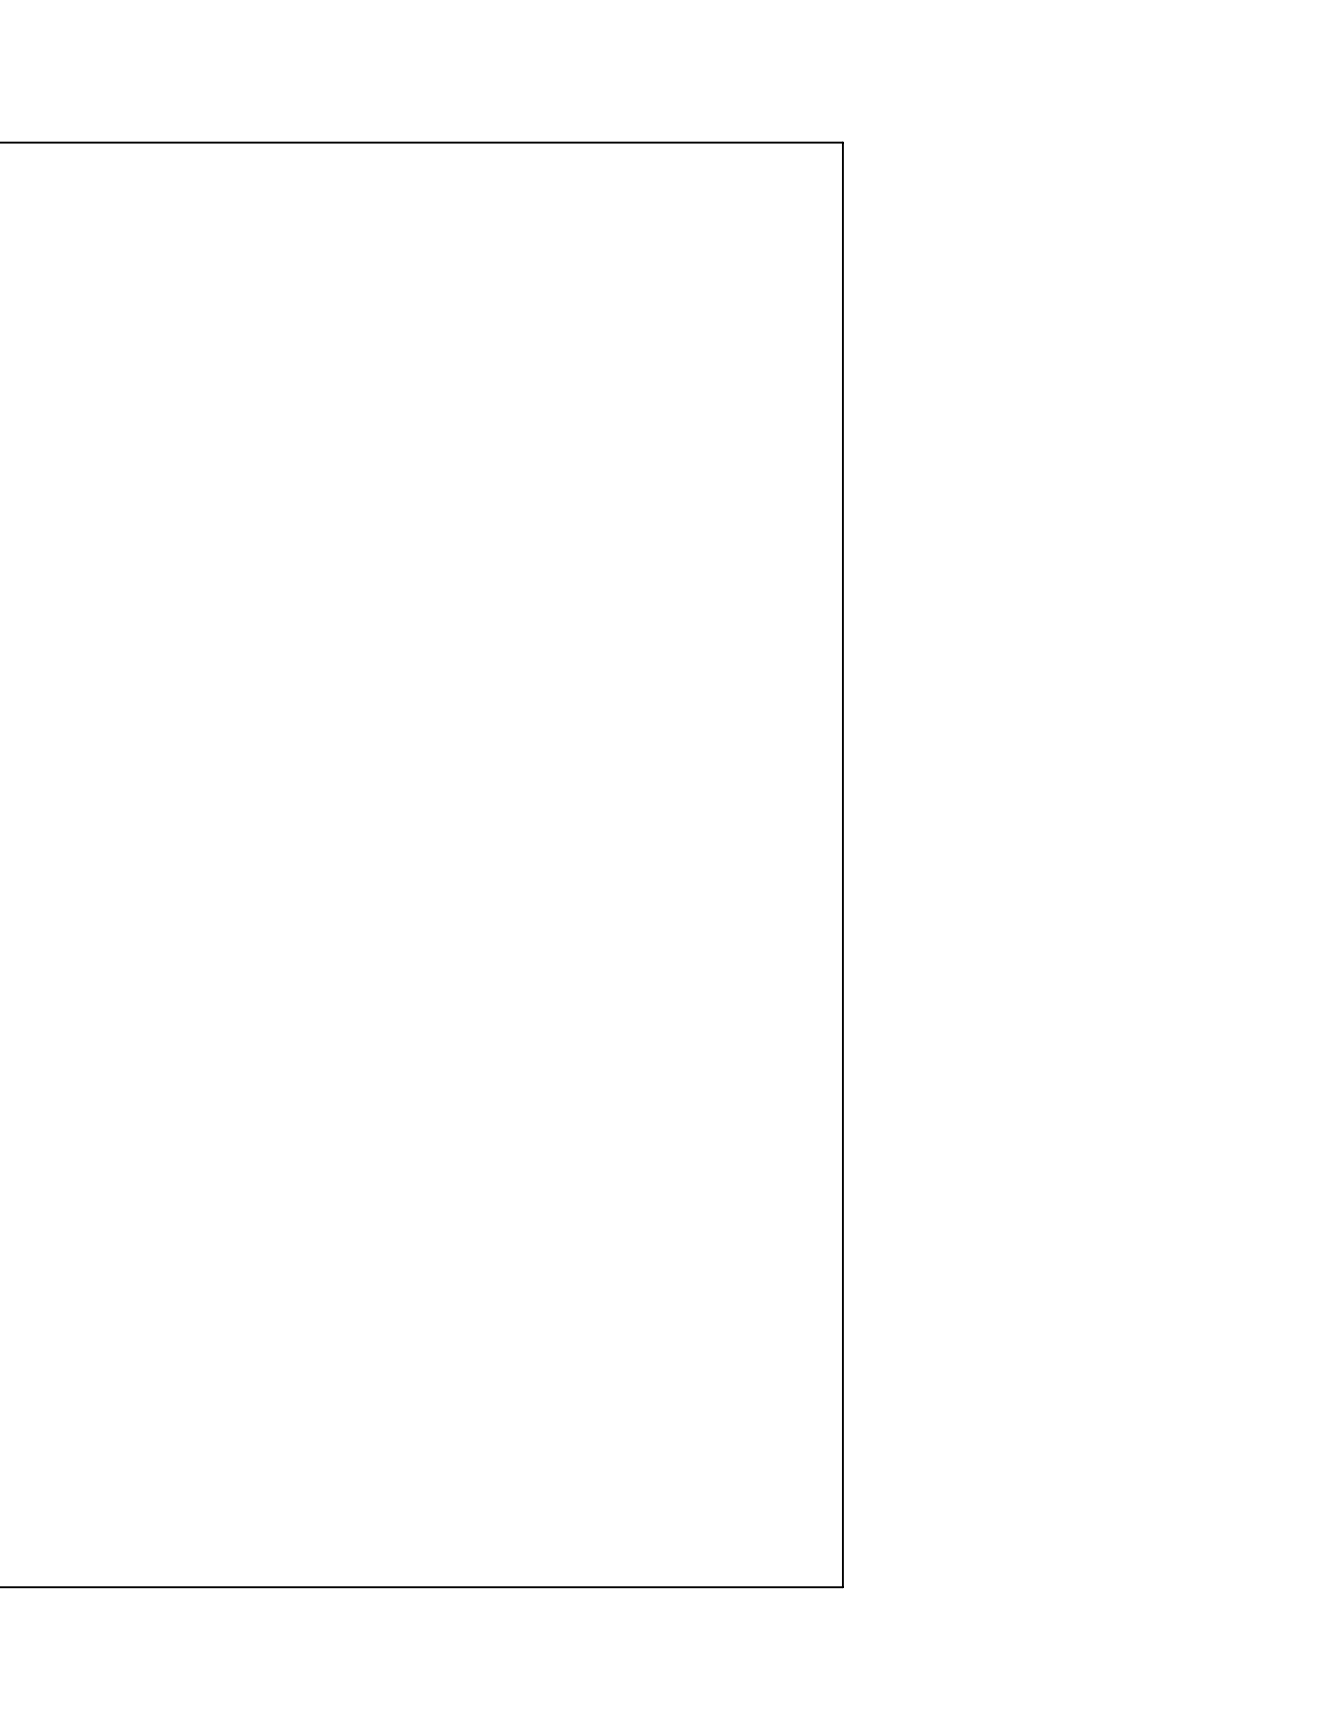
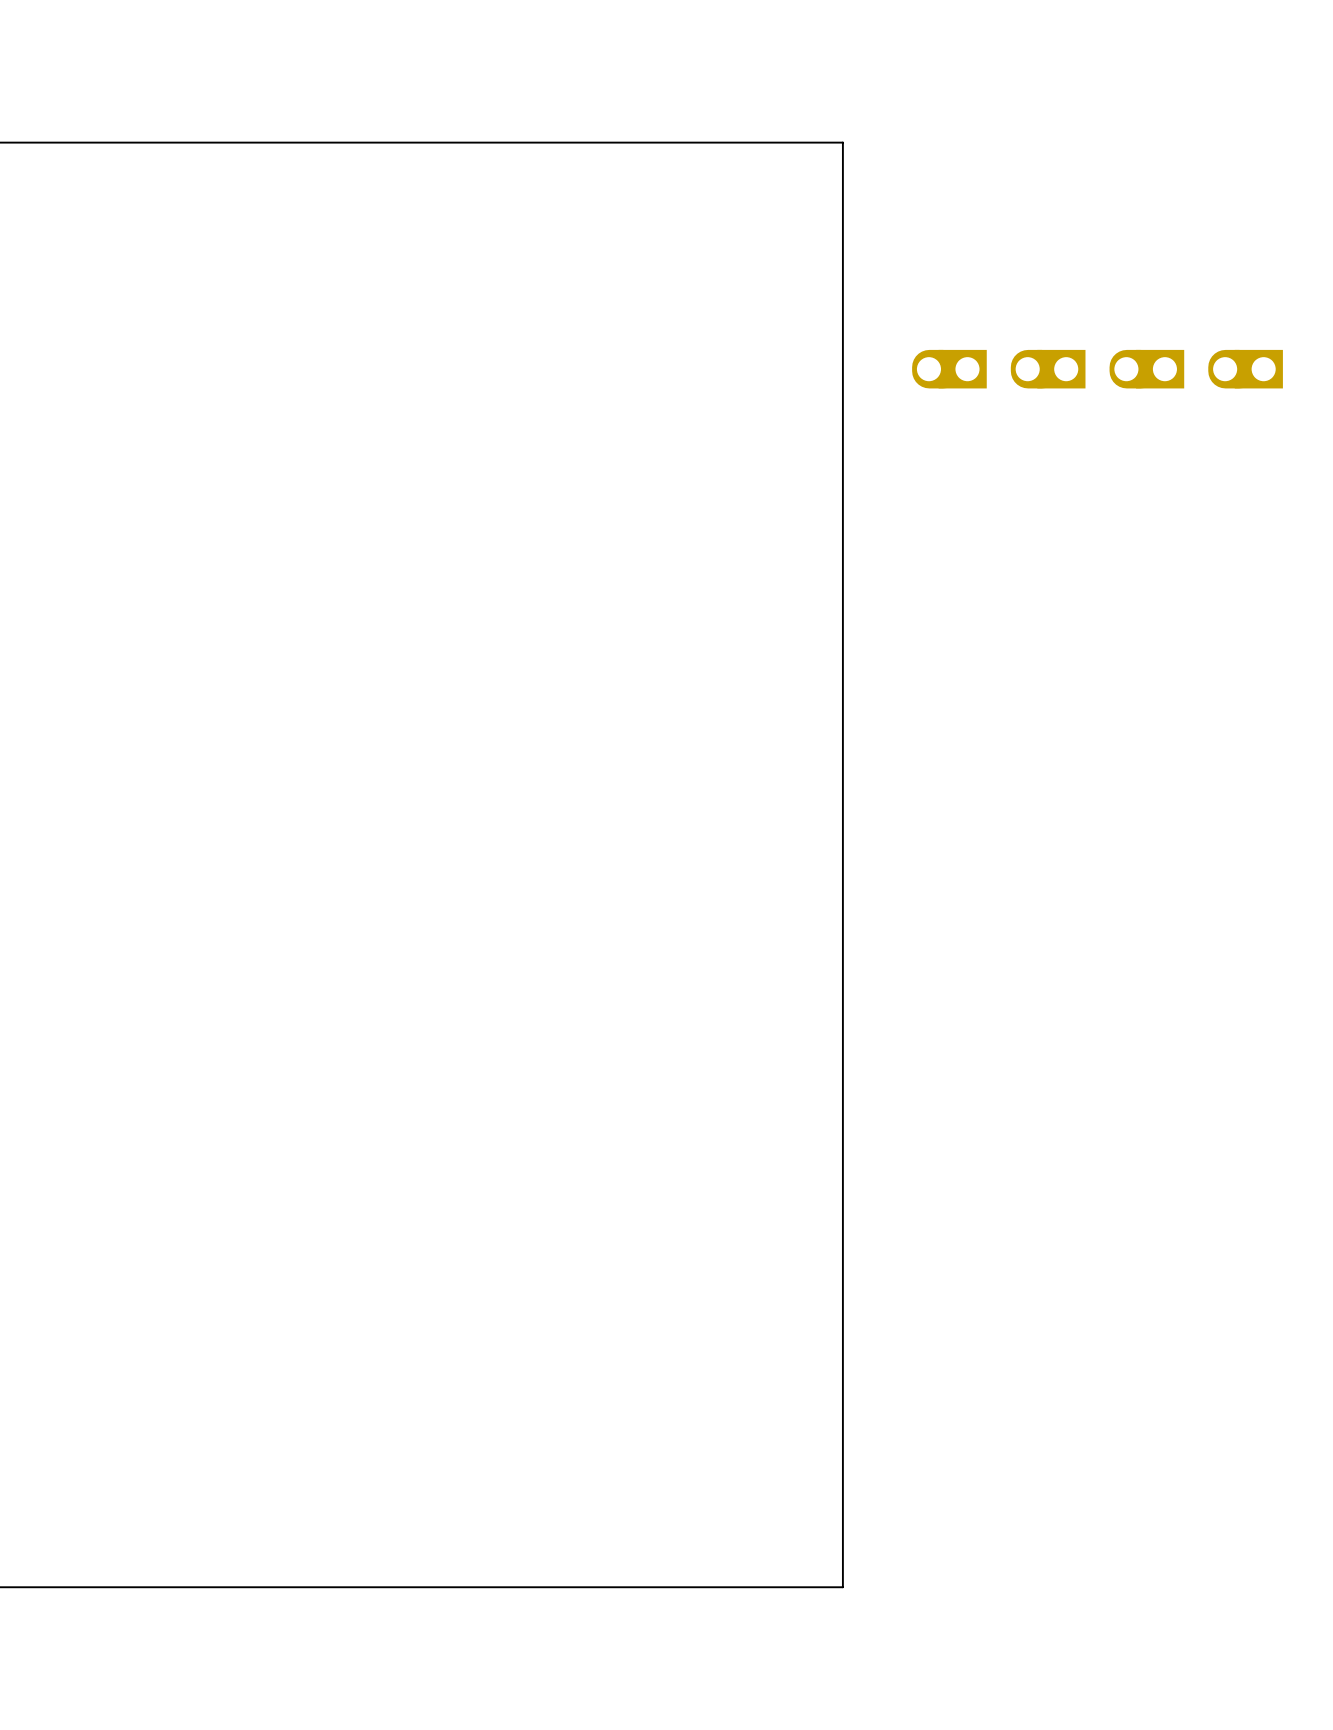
part: none -> (949, 369)
part: none -> (1048, 369)
part: none -> (1146, 369)
part: none -> (1245, 369)

